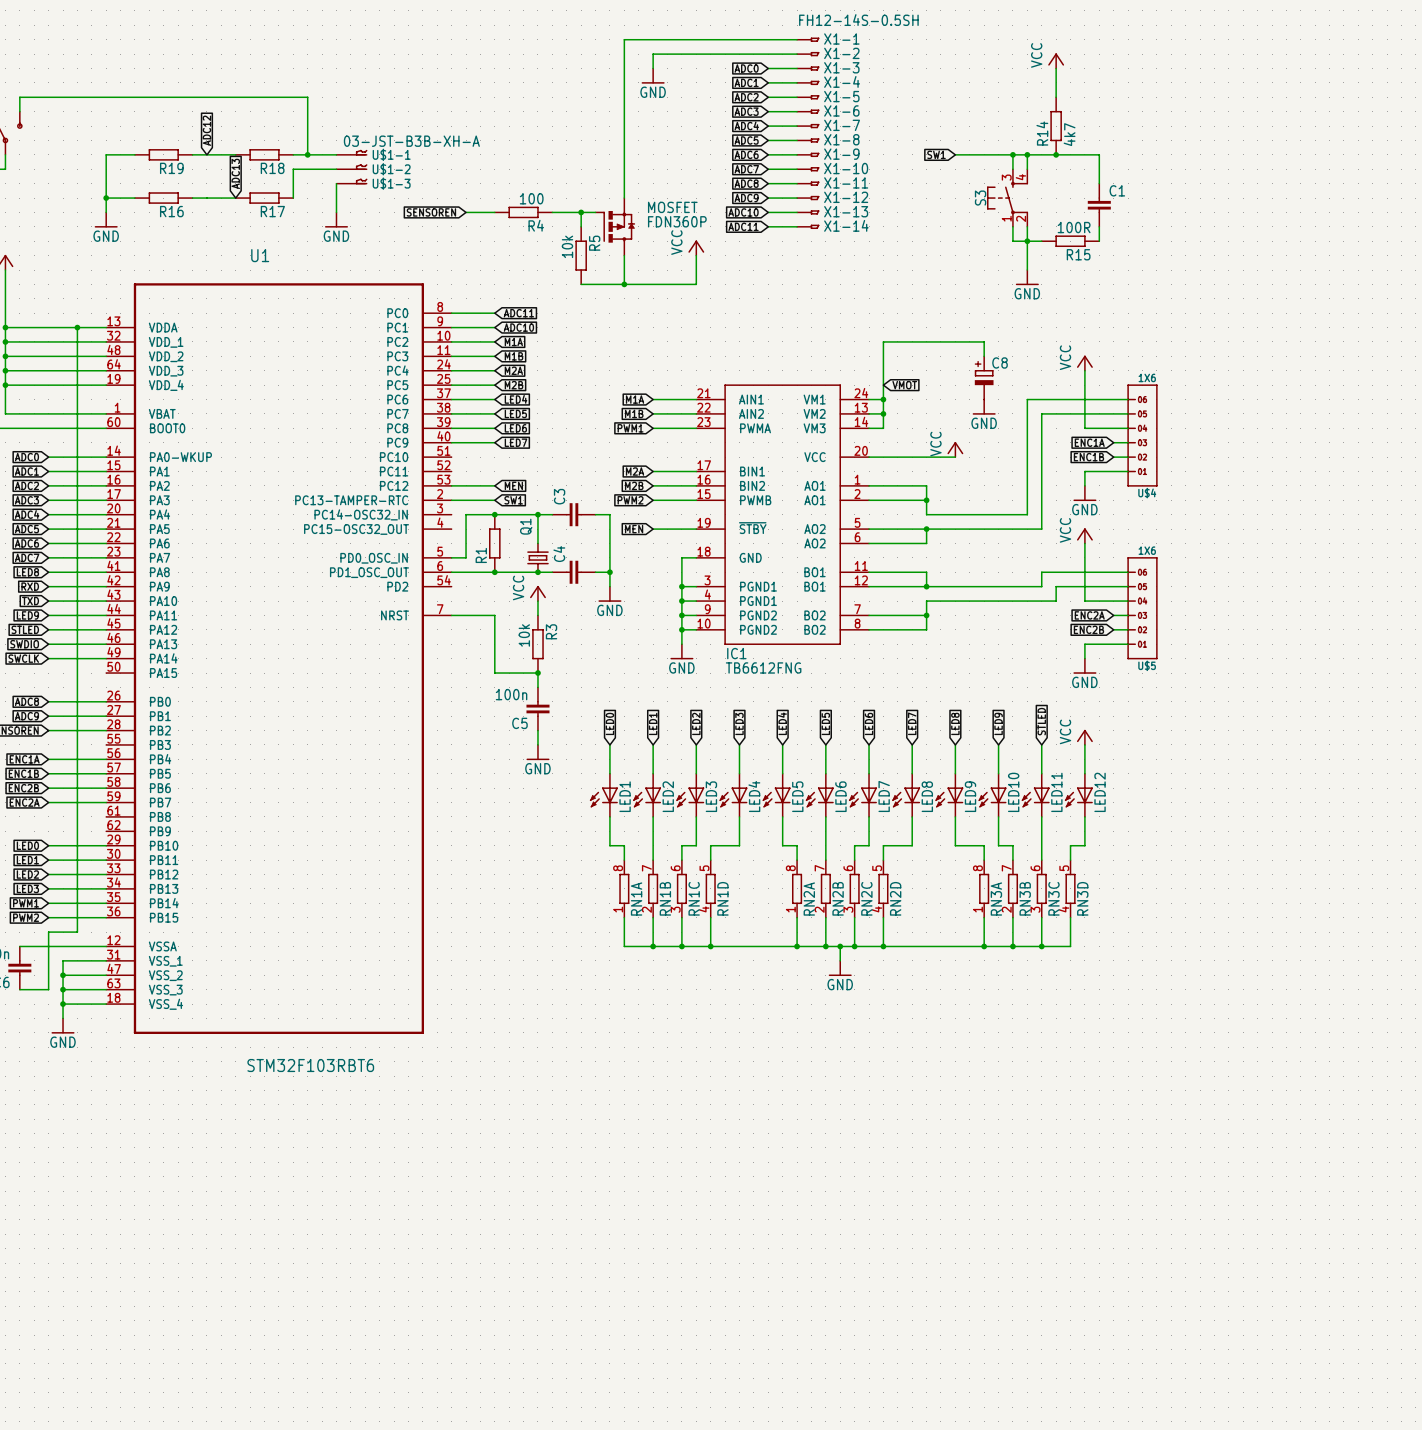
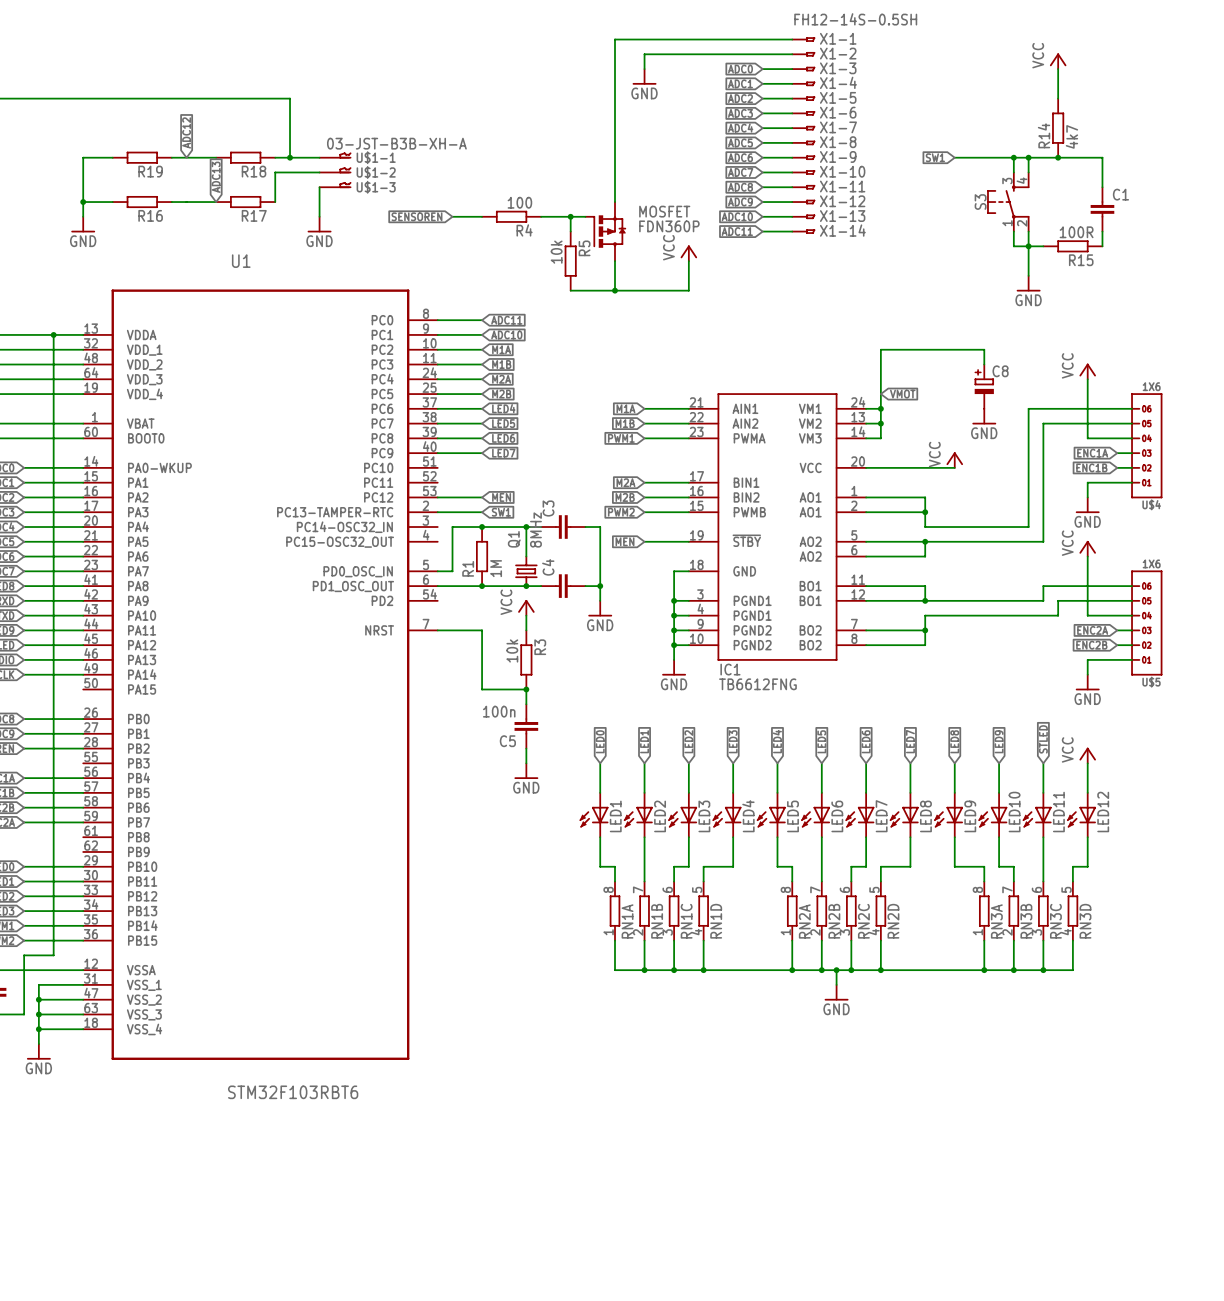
Q1 value: none -> 8MHz (535, 530)
R1 value: none -> 1M (496, 568)

